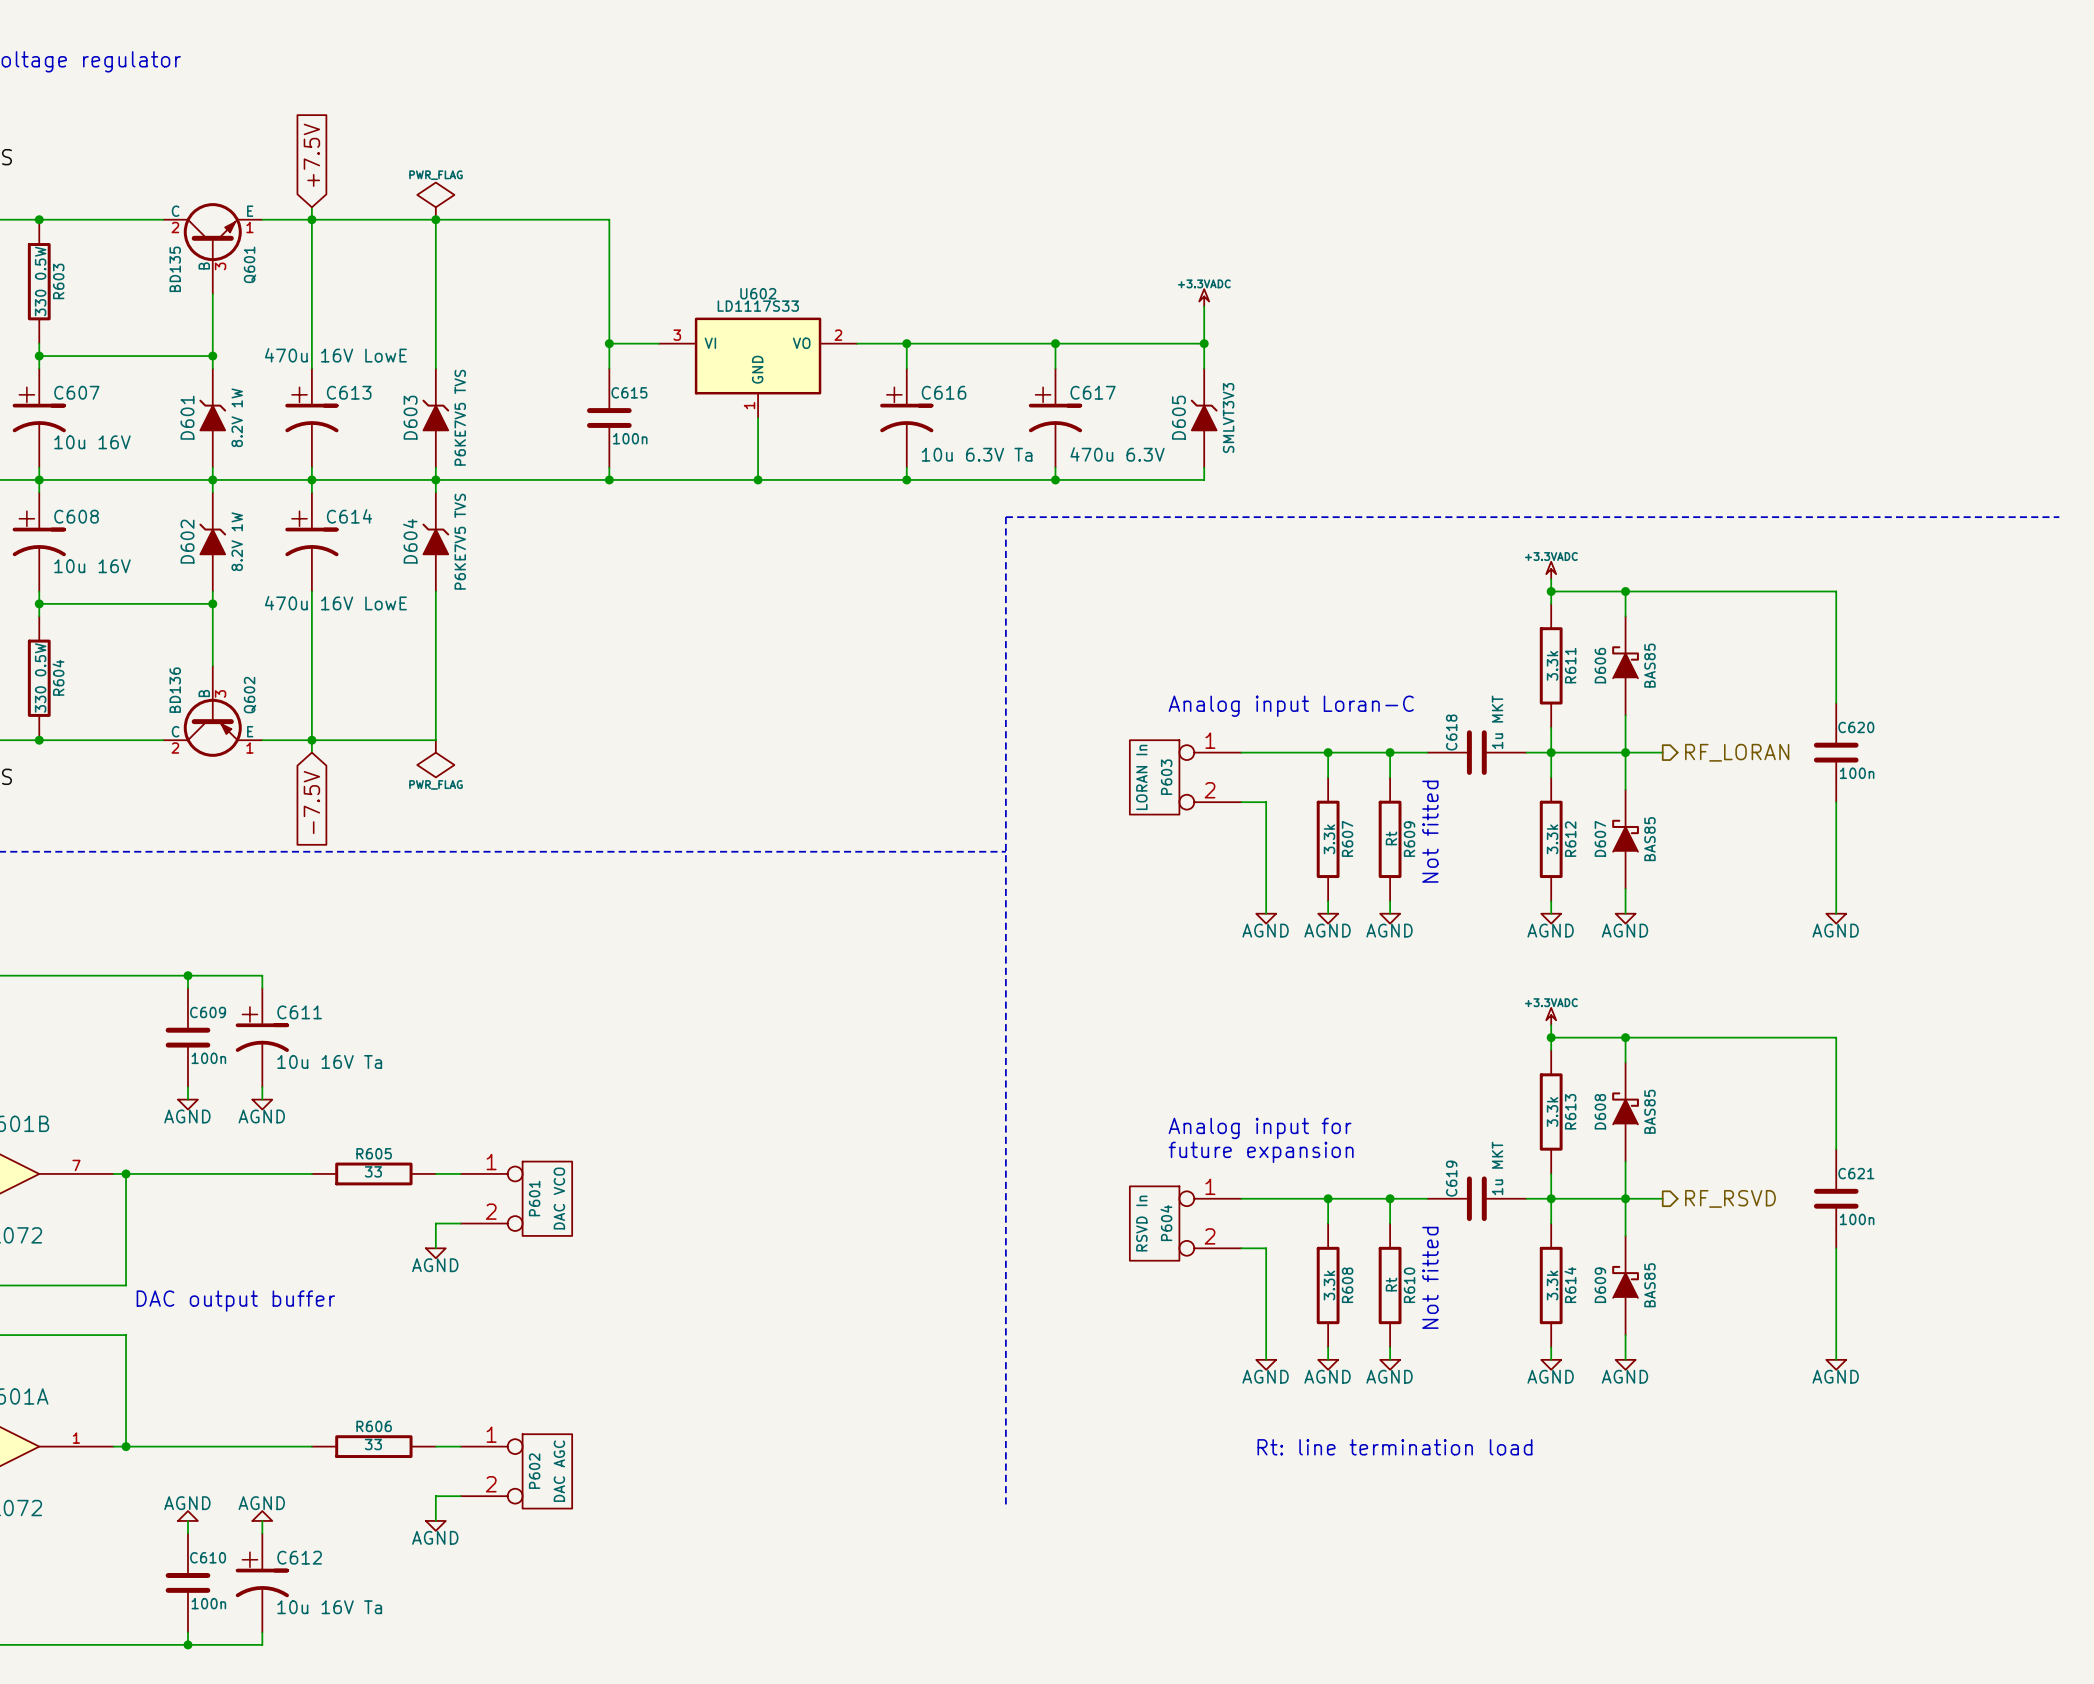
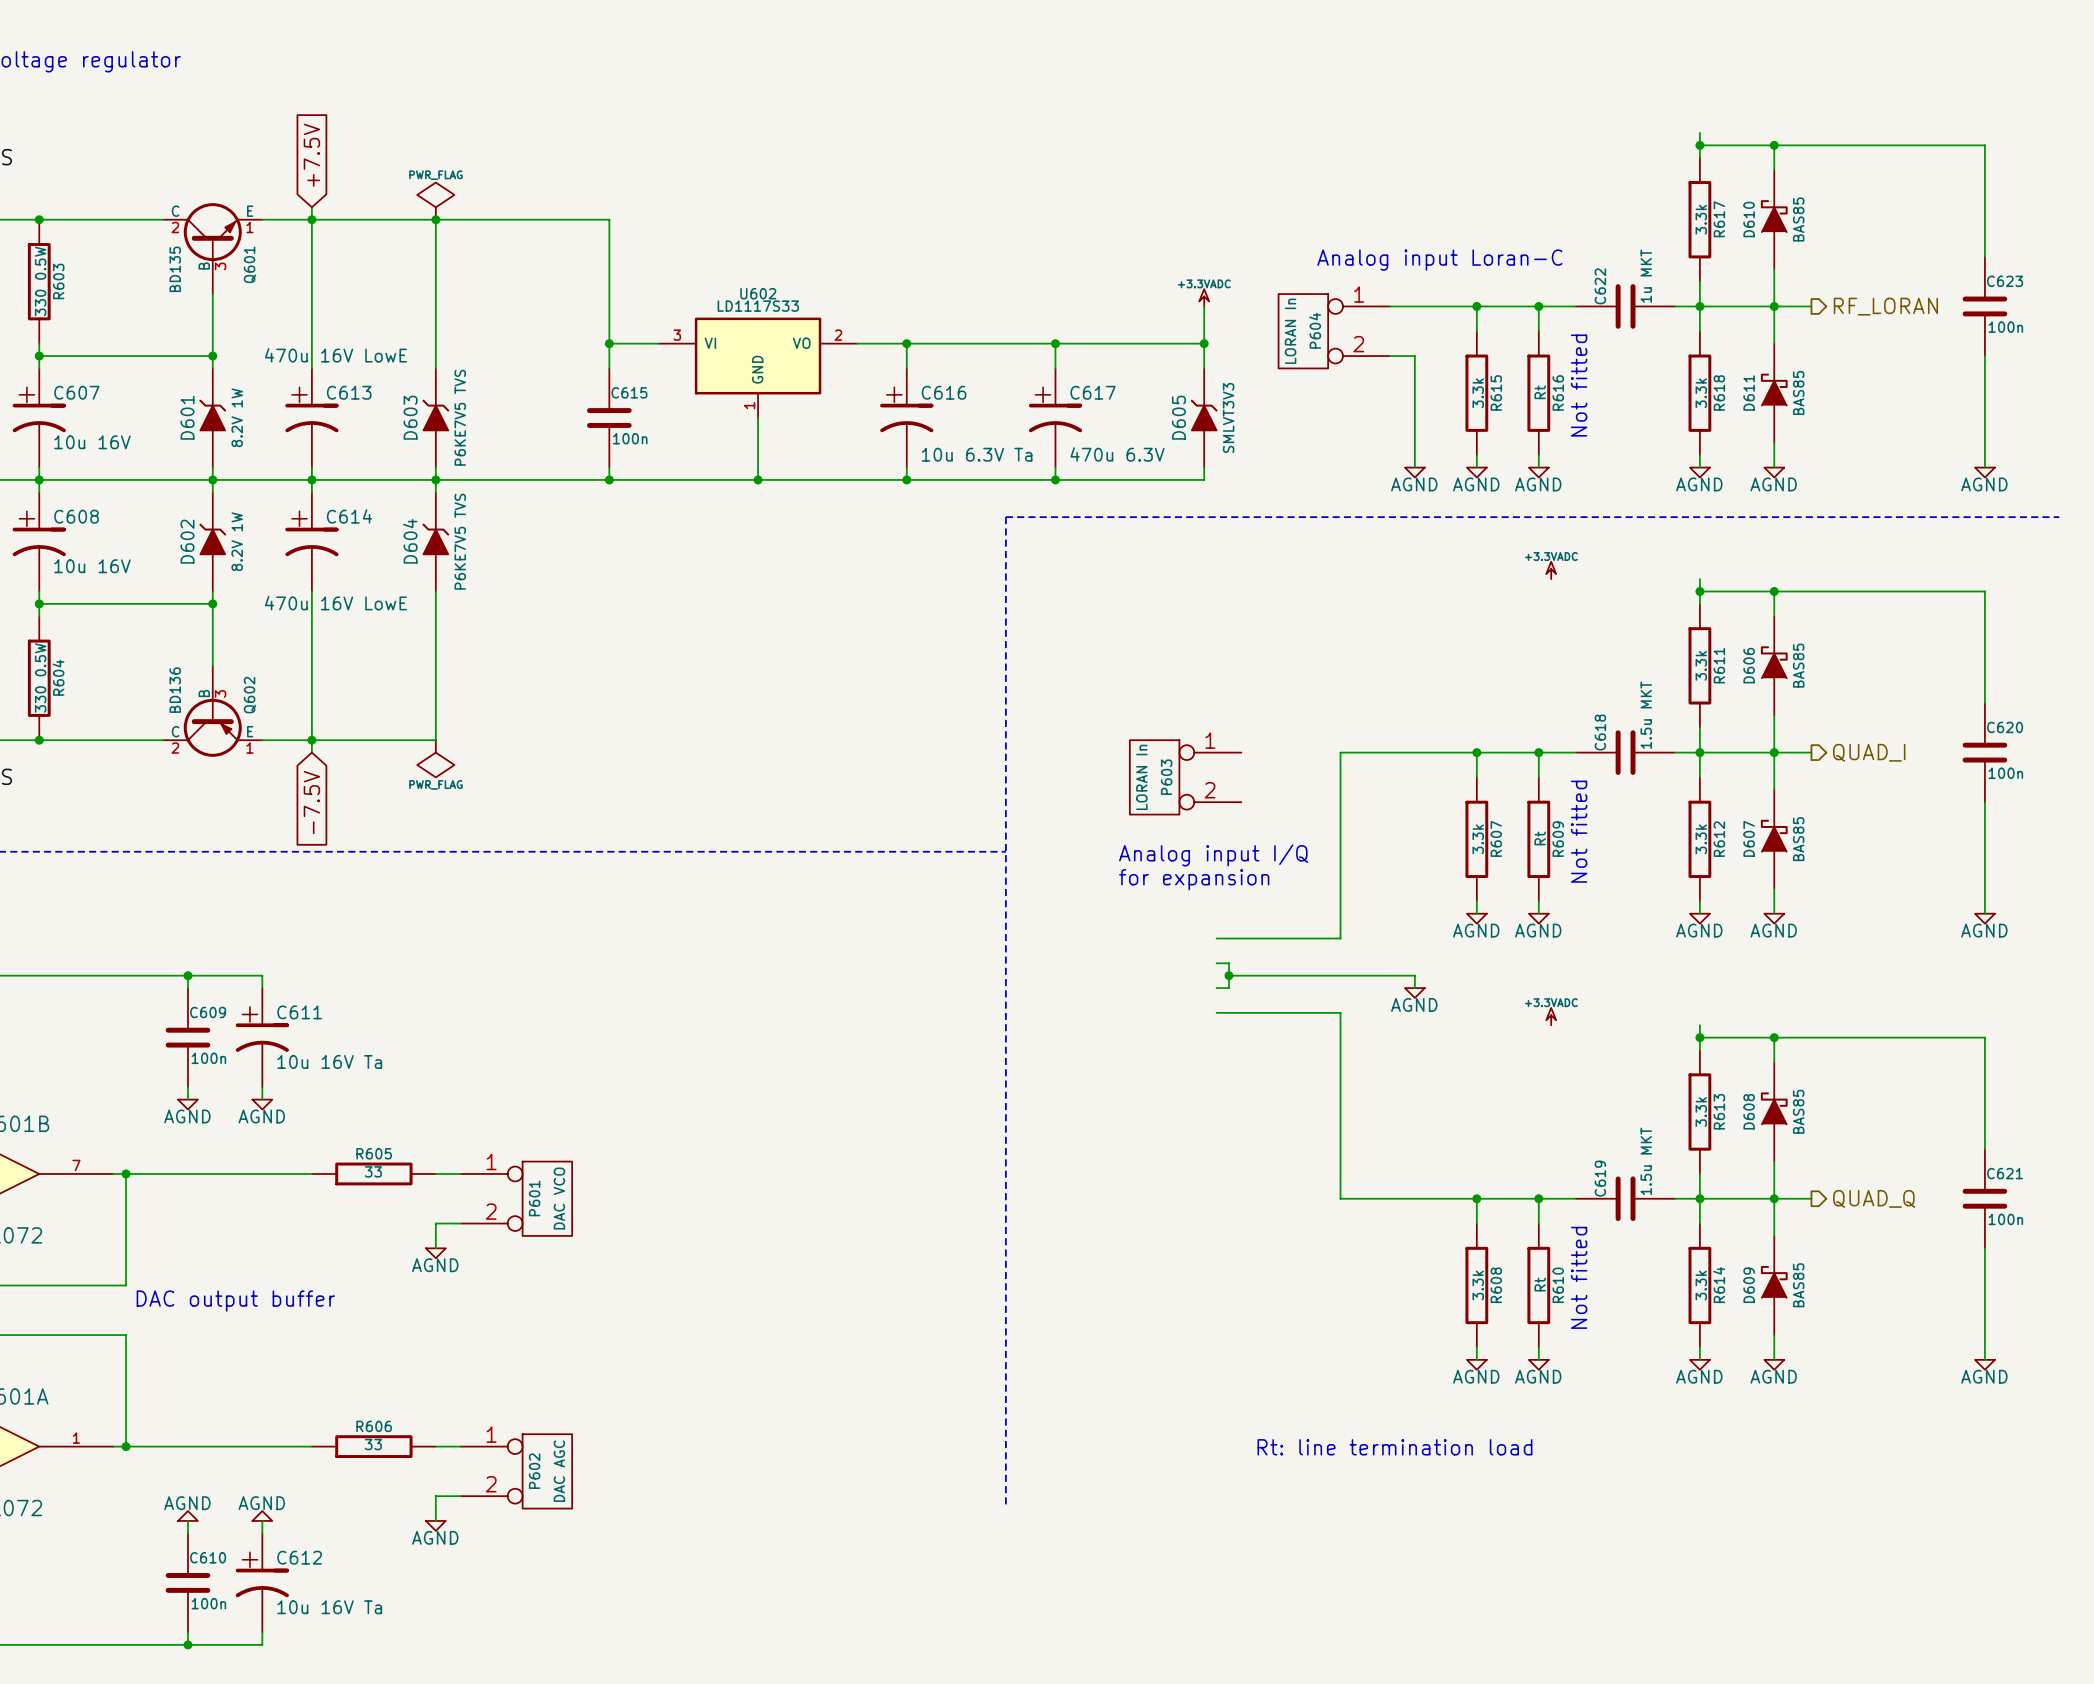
wire: none -> (1699, 132) (1699, 157)
wire: none -> (1699, 145) (1984, 145) (1984, 256)
junction: none -> (1699, 145)
wire: none -> (1774, 145) (1774, 170)
junction: none -> (1774, 145)
R617: none -> 3.3k (1699, 219)
D610: none -> BAS85 (1774, 219)
text: none -> Analog input Loran-C (1439, 260)
wire: none -> (1774, 269) (1774, 343)
wire: none -> (1699, 281) (1699, 331)
wire: none -> (1390, 306) (1575, 306)
wire: none -> (1476, 306) (1476, 331)
junction: none -> (1476, 306)
wire: none -> (1538, 306) (1538, 331)
junction: none -> (1538, 306)
C622: none -> 1u MKT (1625, 306)
wire: none -> (1675, 306) (1811, 306)
junction: none -> (1699, 306)
junction: none -> (1774, 306)
hierarchical label: none -> RF_LORAN (1885, 306)
C623: none -> 100n (1984, 306)
wire: none -> (1390, 356) (1414, 356) (1414, 467)
wire: none -> (1984, 356) (1984, 467)
text: none -> Not fitted (1579, 385)
R615: none -> 3.3k (1476, 393)
R616: none -> Rt (1538, 393)
R618: none -> 3.3k (1699, 393)
D611: none -> BAS85 (1774, 393)
wire: none -> (1774, 442) (1774, 467)
wire: none -> (1476, 455) (1476, 467)
wire: none -> (1538, 455) (1538, 467)
wire: none -> (1699, 455) (1699, 467)
power symbol: none -> AGND (1414, 472)
power symbol: none -> AGND (1476, 472)
power symbol: none -> AGND (1538, 472)
power symbol: none -> AGND (1699, 472)
power symbol: none -> AGND (1774, 472)
power symbol: none -> AGND (1984, 472)
wire: (1551, 579) (1551, 603) -> (1699, 579) (1699, 603)
wire: (1551, 591) (1699, 591) -> none
junction: (1551, 591) -> none
wire: (1625, 591) (1625, 616) -> (1774, 591) (1774, 616)
junction: (1625, 591) -> none
junction: none -> (1699, 591)
junction: none -> (1774, 591)
wire: (1836, 591) (1836, 703) -> (1836, 591) (1984, 591) (1984, 703)
R611 position: (1551, 665) -> (1699, 665)
D606 position: (1625, 665) -> (1774, 665)
text: Analog input Loran-C (1291, 706) -> none
wire: (1625, 715) (1625, 789) -> (1774, 715) (1774, 789)
C618 value: 1u MKT (1497, 722) -> 1.5u MKT (1646, 715)
wire: (1551, 727) (1551, 777) -> (1699, 727) (1699, 777)
wire: (1241, 752) (1340, 752) -> (1216, 938) (1340, 938) (1340, 752)
wire: (1328, 752) (1328, 777) -> (1476, 752) (1476, 777)
junction: (1328, 752) -> none
wire: (1390, 752) (1390, 777) -> (1538, 752) (1538, 777)
junction: (1390, 752) -> none
C618 position: (1476, 752) -> (1625, 752)
junction: none -> (1476, 752)
junction position: (1551, 752) -> (1538, 752)
junction: (1625, 752) -> none
wire: none -> (1675, 752) (1811, 752)
junction: none -> (1699, 752)
hierarchical label: RF_LORAN (1737, 752) -> none
junction: none -> (1774, 752)
C620 position: (1836, 752) -> (1984, 752)
hierarchical label: none -> QUAD_I (1869, 752)
wire: (1241, 802) (1266, 802) (1266, 913) -> none
wire: (1836, 802) (1836, 913) -> (1984, 802) (1984, 913)
text position: Not fitted (1430, 831) -> Not fitted (1579, 831)
R607 position: (1328, 839) -> (1476, 839)
R609 position: (1390, 839) -> (1538, 839)
R612 position: (1551, 839) -> (1699, 839)
D607 position: (1625, 839) -> (1774, 839)
text: none -> Analog input I/Q (1213, 855)
text: none -> for expansion (1194, 879)
wire: (1625, 888) (1625, 913) -> (1774, 888) (1774, 913)
wire: (1328, 901) (1328, 913) -> (1476, 901) (1476, 913)
wire: (1390, 901) (1390, 913) -> (1538, 901) (1538, 913)
wire: (1551, 901) (1551, 913) -> (1699, 901) (1699, 913)
power symbol: AGND (1266, 918) -> none
power symbol: AGND (1328, 918) -> none
power symbol: AGND (1390, 918) -> none
power symbol: none -> AGND (1476, 918)
power symbol position: AGND (1551, 918) -> AGND (1538, 918)
power symbol: AGND (1625, 918) -> none
power symbol: none -> AGND (1699, 918)
power symbol position: AGND (1836, 918) -> AGND (1774, 918)
power symbol: none -> AGND (1984, 918)
wire: none -> (1216, 963) (1228, 963) (1228, 988) (1216, 988)
wire: none -> (1228, 975) (1414, 975) (1414, 988)
junction: none -> (1228, 975)
power symbol: none -> AGND (1414, 993)
wire: (1551, 1025) (1551, 1050) -> (1699, 1025) (1699, 1050)
wire: (1551, 1037) (1699, 1037) -> none
junction: (1551, 1037) -> none
wire: (1625, 1037) (1625, 1062) -> (1774, 1037) (1774, 1062)
junction: (1625, 1037) -> none
junction: none -> (1699, 1037)
junction: none -> (1774, 1037)
wire: (1836, 1037) (1836, 1149) -> (1836, 1037) (1984, 1037) (1984, 1149)
R613 position: (1551, 1112) -> (1699, 1112)
D608 position: (1625, 1112) -> (1774, 1112)
text: Analog input for (1260, 1128) -> none
text: future expansion (1261, 1152) -> none
wire: (1625, 1161) (1625, 1235) -> (1774, 1161) (1774, 1235)
C619 value: 1u MKT (1497, 1168) -> 1.5u MKT (1646, 1161)
wire: (1551, 1173) (1551, 1223) -> (1699, 1173) (1699, 1223)
wire: (1241, 1198) (1340, 1198) -> (1216, 1012) (1340, 1012) (1340, 1198)
wire: (1328, 1198) (1328, 1223) -> (1476, 1198) (1476, 1223)
junction: (1328, 1198) -> none
wire: (1390, 1198) (1390, 1223) -> (1538, 1198) (1538, 1223)
junction: (1390, 1198) -> none
C619 position: (1476, 1198) -> (1625, 1198)
junction: none -> (1476, 1198)
junction position: (1551, 1198) -> (1538, 1198)
junction: (1625, 1198) -> none
wire: none -> (1675, 1198) (1811, 1198)
junction: none -> (1699, 1198)
hierarchical label: RF_RSVD (1730, 1198) -> none
junction: none -> (1774, 1198)
C621 position: (1836, 1198) -> (1984, 1198)
hierarchical label: none -> QUAD_Q (1874, 1198)
P604 value: RSVD In (1141, 1223) -> LORAN In (1290, 331)
P604 position: (1185, 1223) -> (1334, 331)
wire: (1241, 1248) (1266, 1248) (1266, 1359) -> none
wire: (1836, 1248) (1836, 1359) -> (1984, 1248) (1984, 1359)
text position: Not fitted (1430, 1277) -> Not fitted (1579, 1277)
R608 position: (1328, 1285) -> (1476, 1285)
R610 position: (1390, 1285) -> (1538, 1285)
R614 position: (1551, 1285) -> (1699, 1285)
D609 position: (1625, 1285) -> (1774, 1285)
wire: (1625, 1335) (1625, 1359) -> (1774, 1335) (1774, 1359)
wire: (1328, 1347) (1328, 1359) -> (1476, 1347) (1476, 1359)
wire: (1390, 1347) (1390, 1359) -> (1538, 1347) (1538, 1359)
wire: (1551, 1347) (1551, 1359) -> (1699, 1347) (1699, 1359)
power symbol: AGND (1266, 1364) -> none
power symbol: AGND (1328, 1364) -> none
power symbol: AGND (1390, 1364) -> none
power symbol: none -> AGND (1476, 1364)
power symbol position: AGND (1551, 1364) -> AGND (1538, 1364)
power symbol: AGND (1625, 1364) -> none
power symbol: none -> AGND (1699, 1364)
power symbol position: AGND (1836, 1364) -> AGND (1774, 1364)
power symbol: none -> AGND (1984, 1364)

